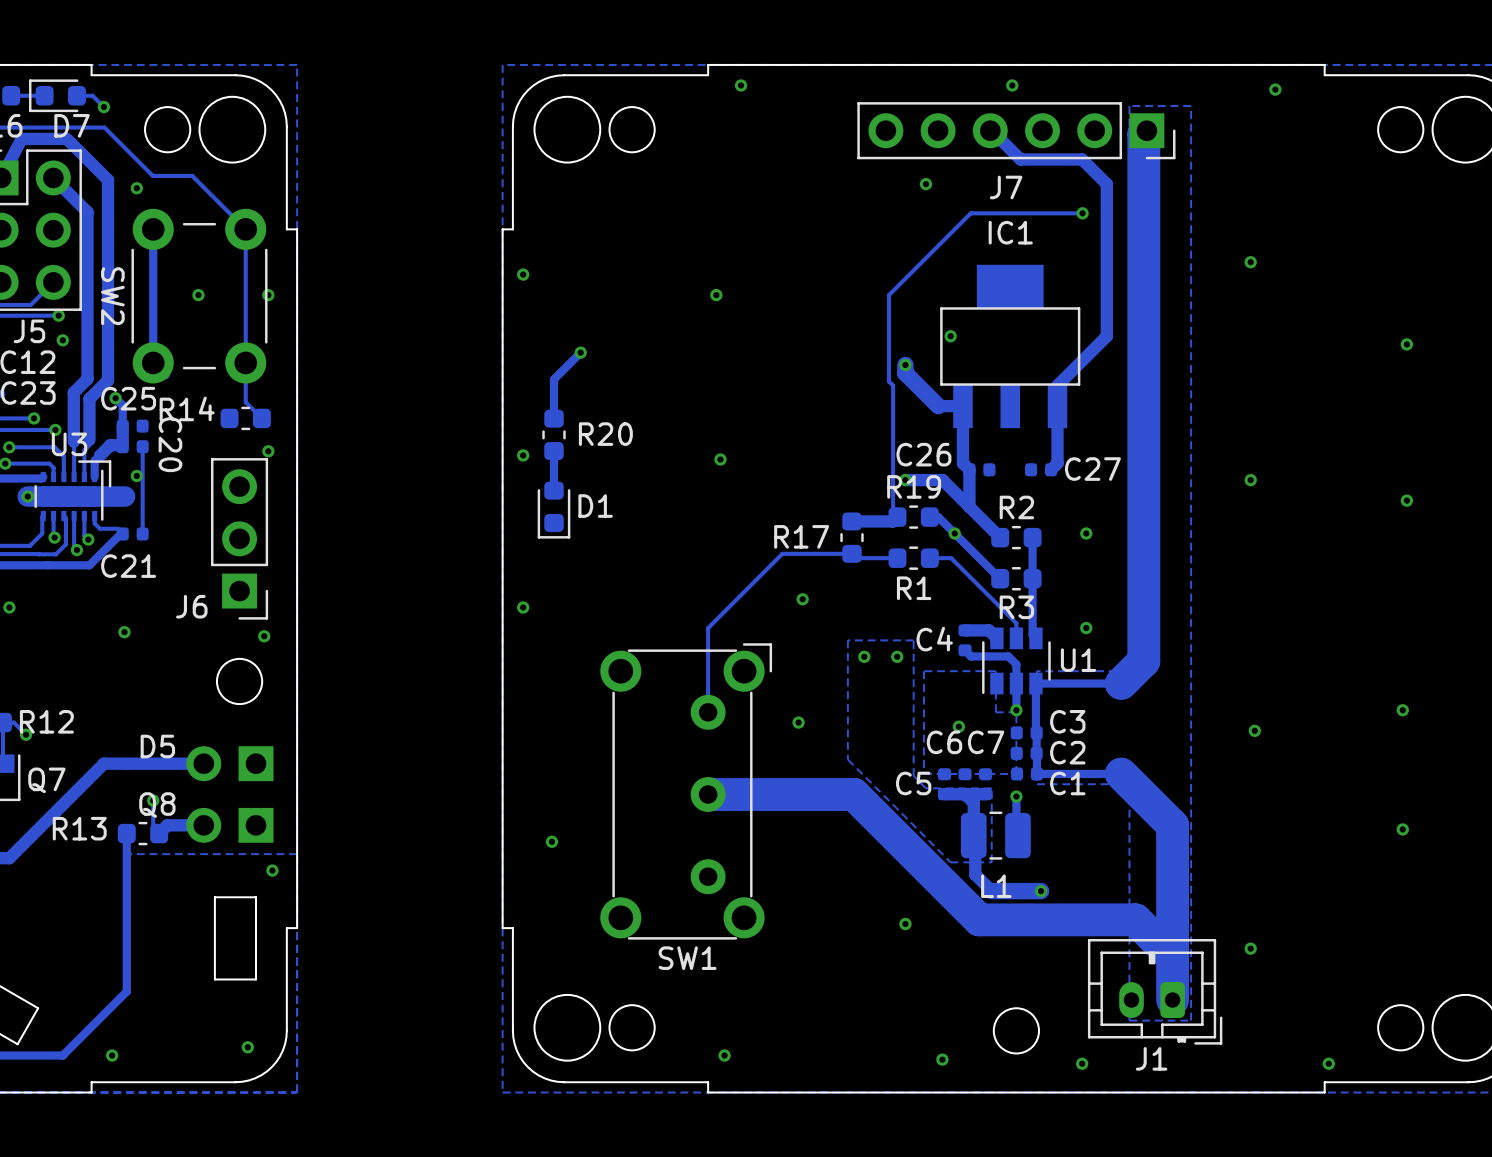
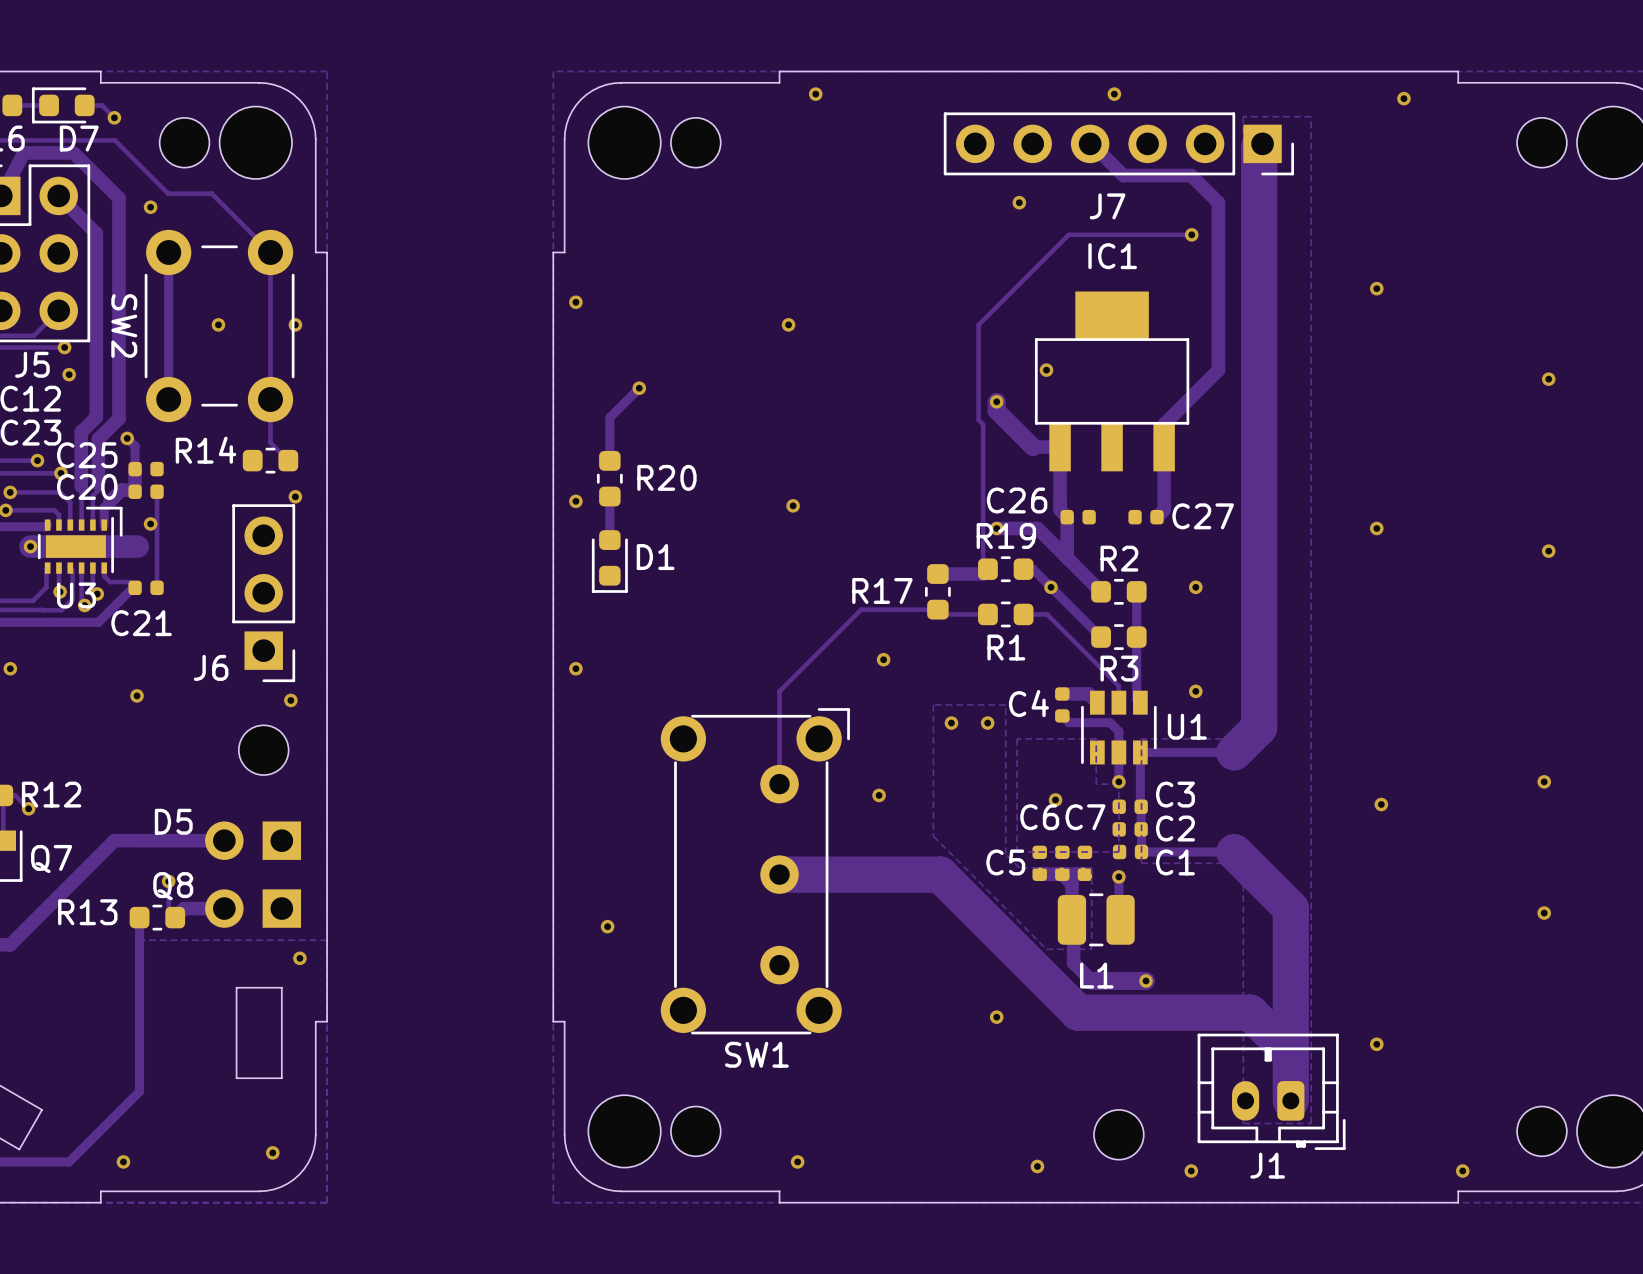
C25 name position: C25 (128, 398) -> C25 (87, 455)
U3 name position: U3 (69, 444) -> U3 (76, 595)
C20 name rotation: 0° (170, 444) -> 90° counterclockwise (87, 486)
C20 name position: C20 (170, 444) -> C20 (87, 486)

